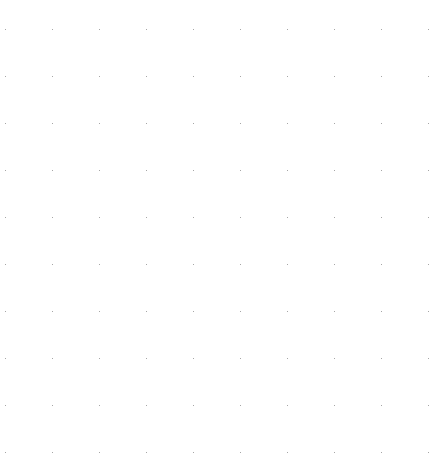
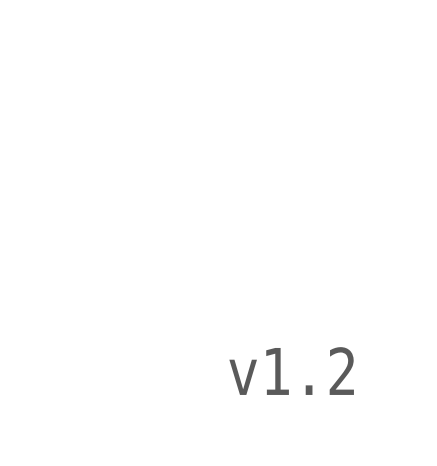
text: none -> v1.2 (291, 371)

